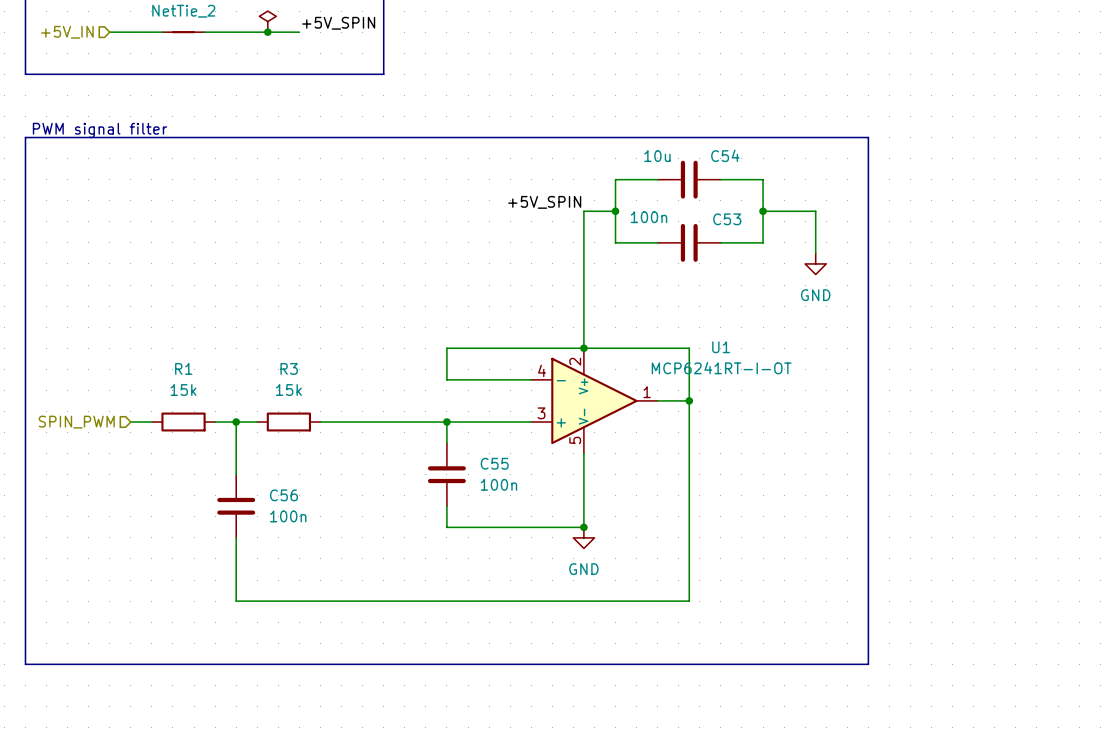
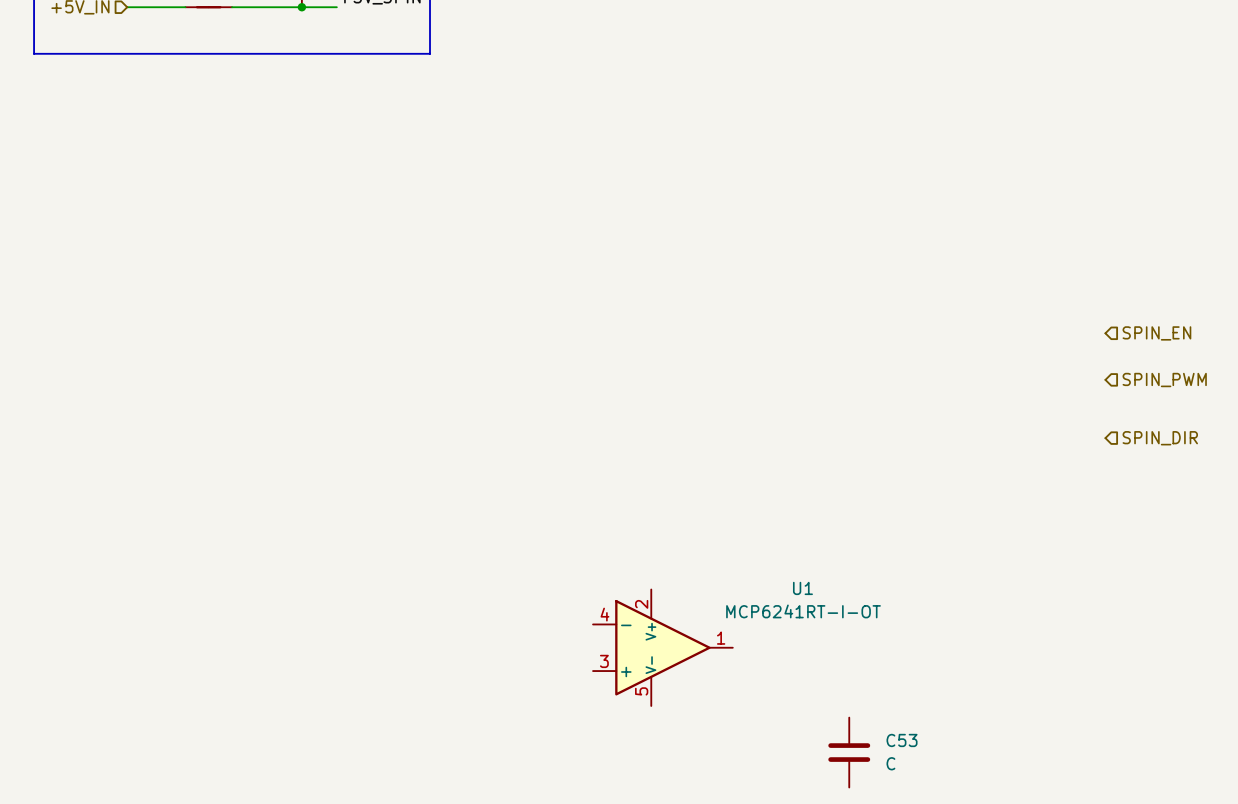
text: PWM signal filter (99, 130) -> none
line: (25, 137) (868, 137) (868, 664) (25, 664) (25, 137) -> none
wire: (657, 179) (615, 179) (615, 242) (657, 242) -> none
C54: 10u (689, 179) -> none
wire: (720, 179) (763, 179) (763, 242) (720, 242) -> none
label: +5V_SPIN (544, 202) -> none
wire: (615, 211) (583, 211) (583, 348) -> none
junction: (615, 211) -> none
wire: (763, 211) (815, 211) (815, 253) -> none
junction: (763, 211) -> none
C53 value: 100n (648, 217) -> C (890, 763)
C53 name position: C53 (727, 219) -> C53 (902, 740)
C53 rotation: 0° (689, 242) -> 90° clockwise (849, 752)
C53 position: (689, 242) -> (849, 752)
power symbol: GND (815, 263) -> none
hierarchical label: none -> SPIN_EN (1156, 333)
junction: (583, 348) -> none
hierarchical label: none -> SPIN_PWM (1164, 380)
wire: (531, 379) (446, 379) (446, 348) (689, 348) (689, 601) (236, 601) (236, 537) -> none
U1 position: (594, 400) -> (662, 647)
wire: (657, 400) (689, 400) -> none
junction: (689, 400) -> none
hierarchical label: SPIN_PWM (76, 422) -> none
wire: (130, 422) (151, 422) -> none
R1: 15k (183, 422) -> none
wire: (215, 422) (257, 422) -> none
wire: (236, 422) (236, 474) -> none
junction: (236, 422) -> none
R3: 15k (288, 422) -> none
wire: (320, 422) (531, 422) -> none
wire: (446, 422) (446, 443) -> none
junction: (446, 422) -> none
hierarchical label: none -> SPIN_DIR (1160, 438)
wire: (583, 453) (583, 527) (446, 527) (446, 506) -> none
C55: 100n (446, 474) -> none
C56: 100n (236, 506) -> none
junction: (583, 527) -> none
power symbol: GND (583, 537) -> none

